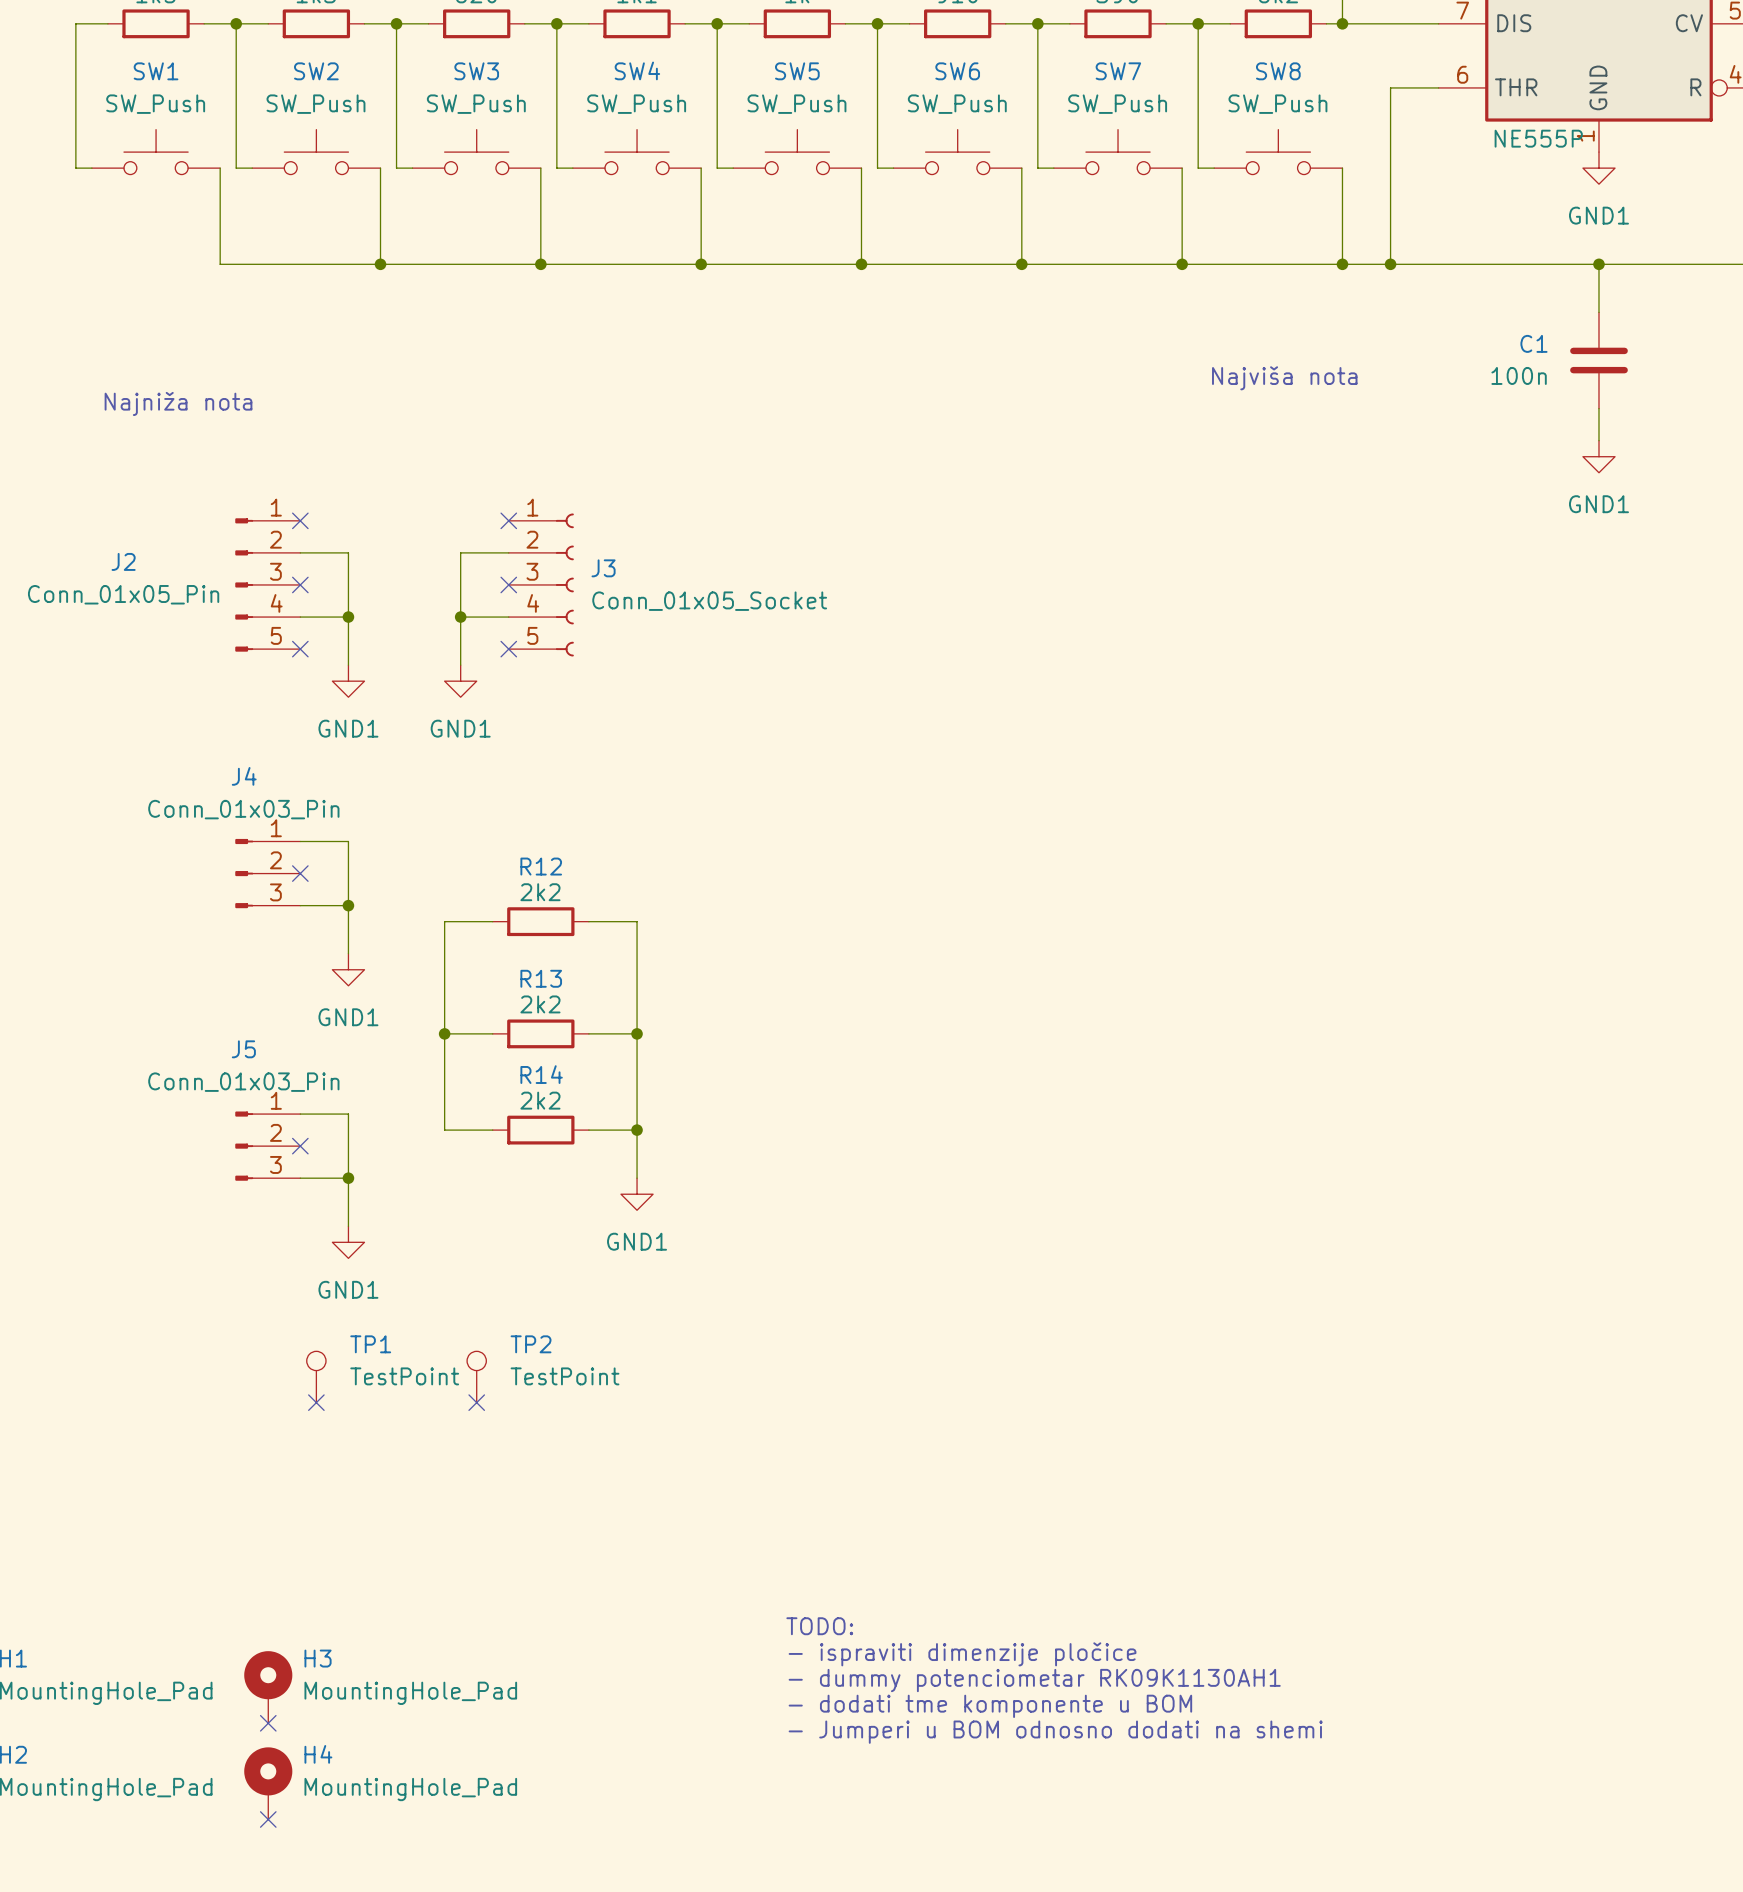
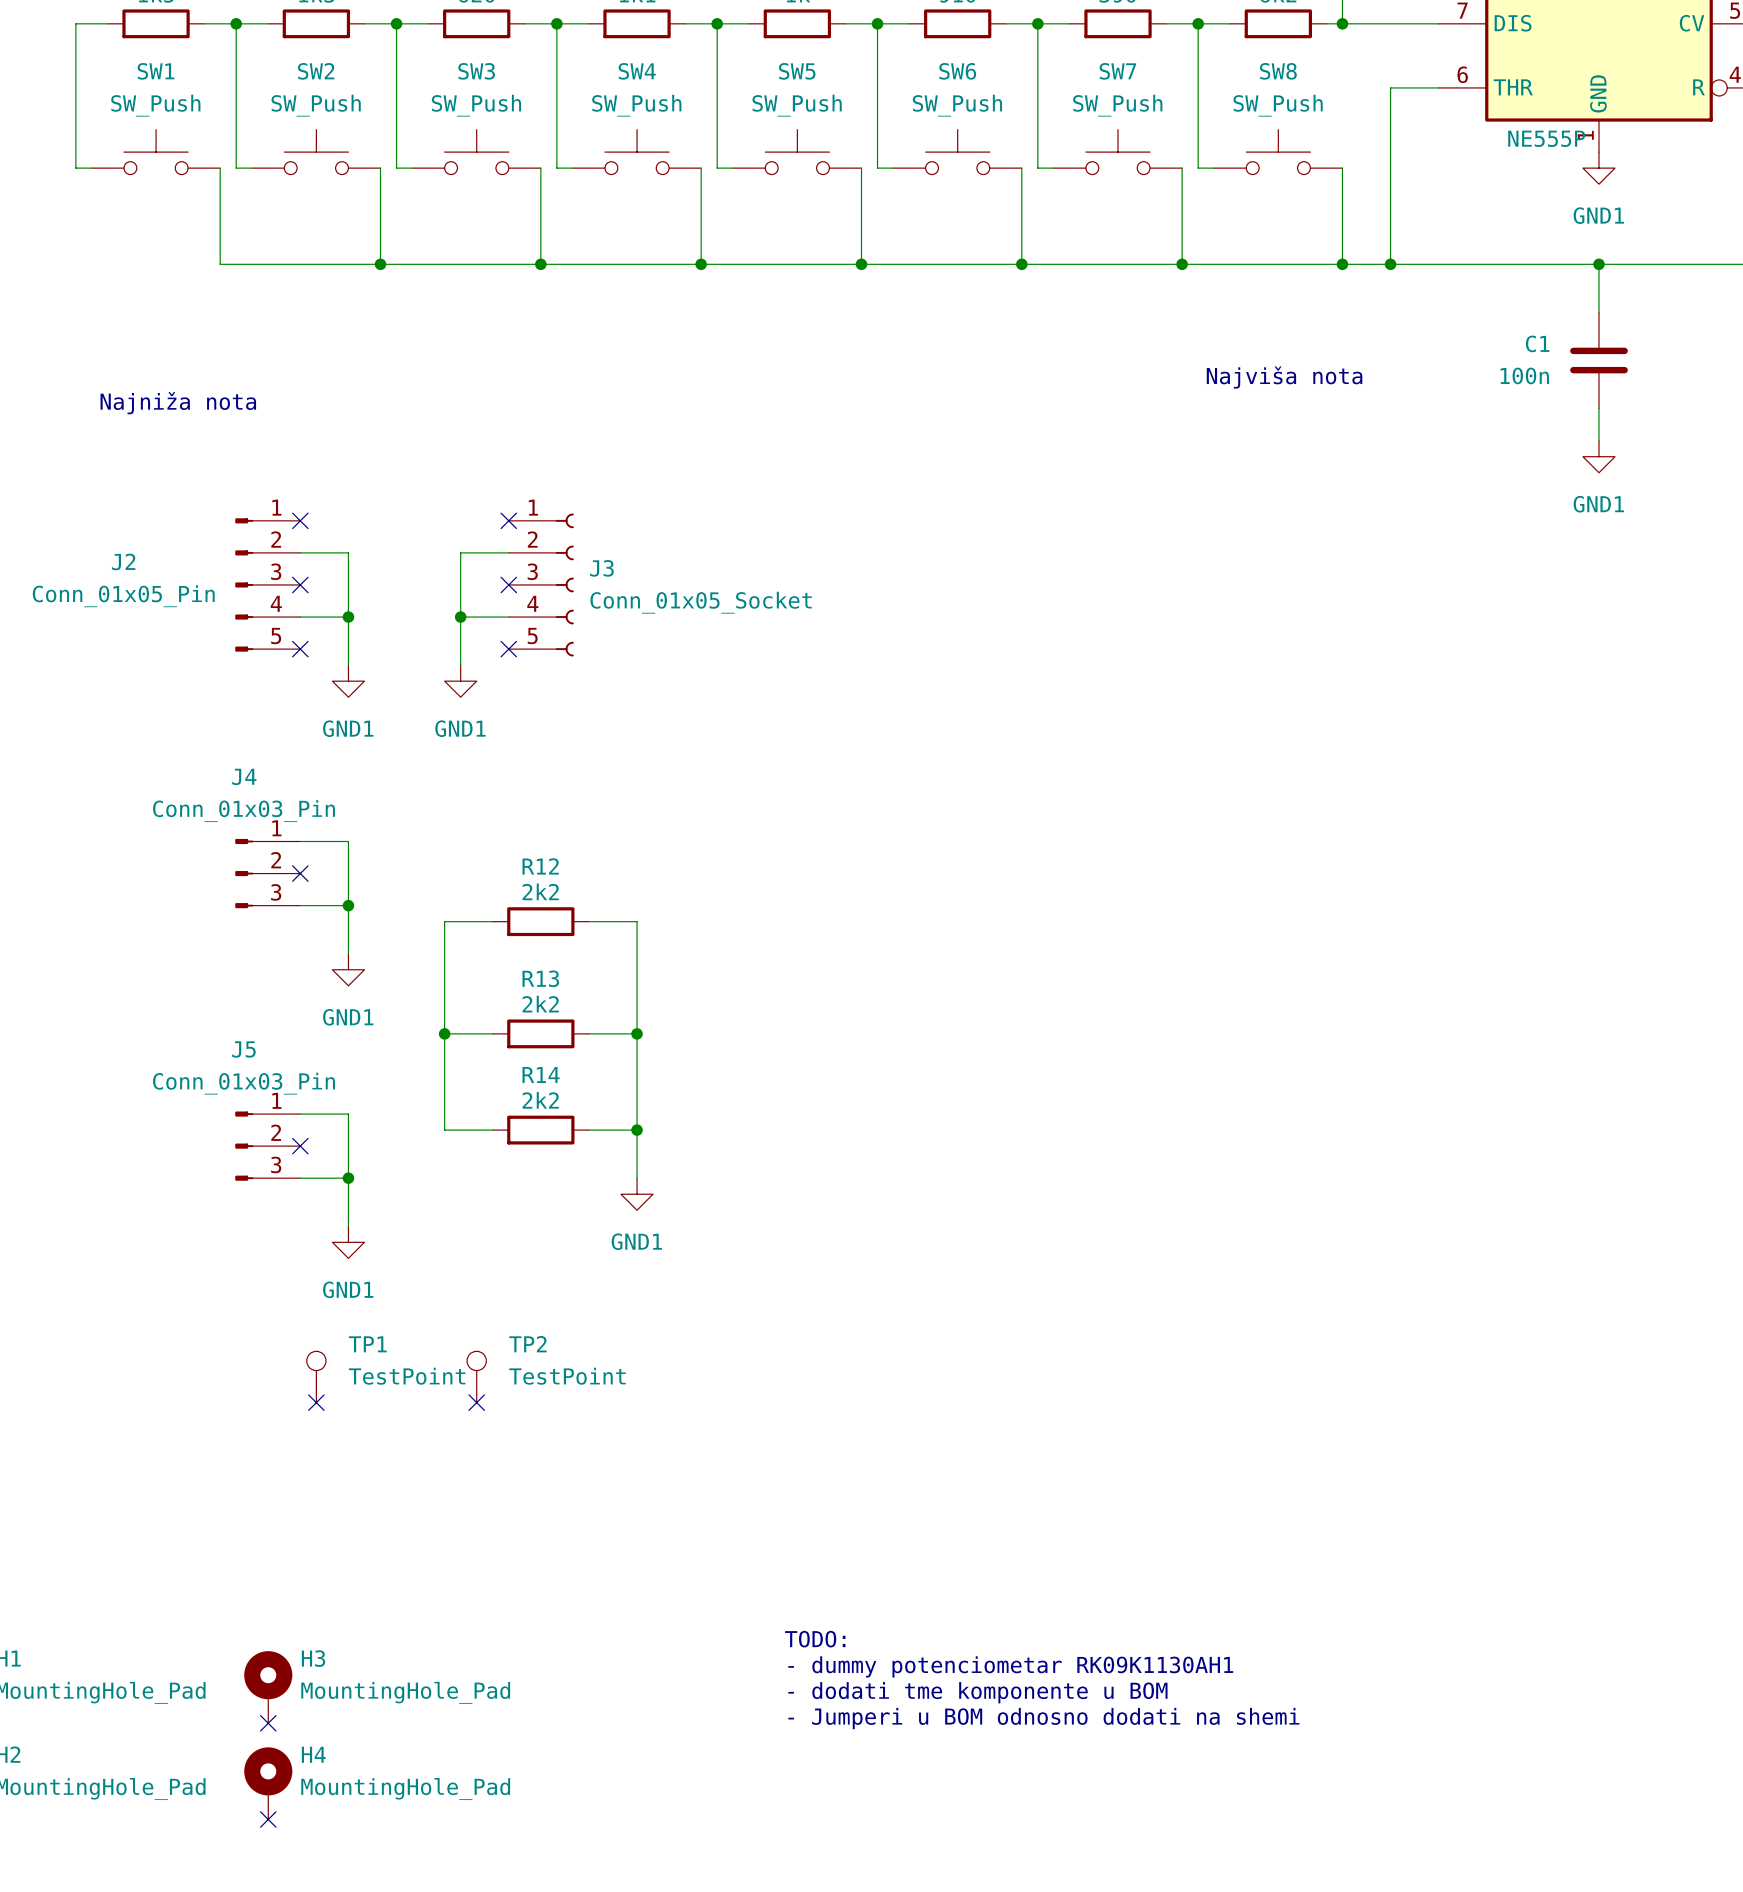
text position: TODO: (819, 1626) -> TODO: (815, 1639)
text: - ispraviti dimenzije pločice (962, 1654) -> none
text position: - dummy potenciometar RK09K1130AH1 (1034, 1680) -> - dummy potenciometar RK09K1130AH1 (1010, 1666)
text position: - dodati tme komponente u BOM (990, 1706) -> - dodati tme komponente u BOM (977, 1692)
text position: - Jumperi u BOM odnosno dodati na shemi (1055, 1732) -> - Jumperi u BOM odnosno dodati na shemi (1043, 1718)

